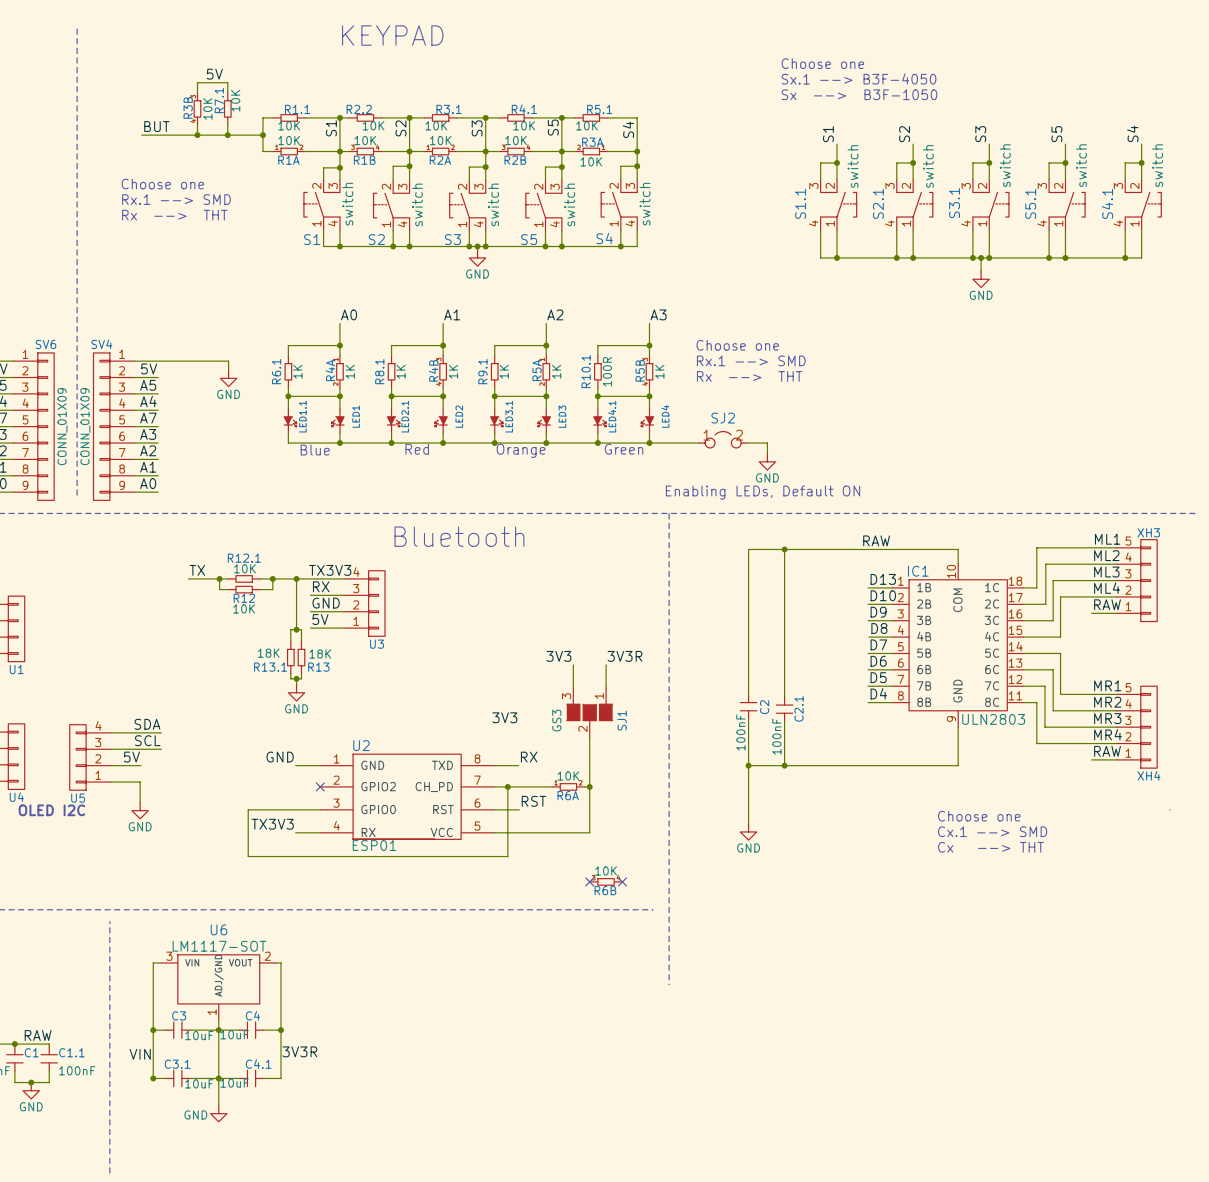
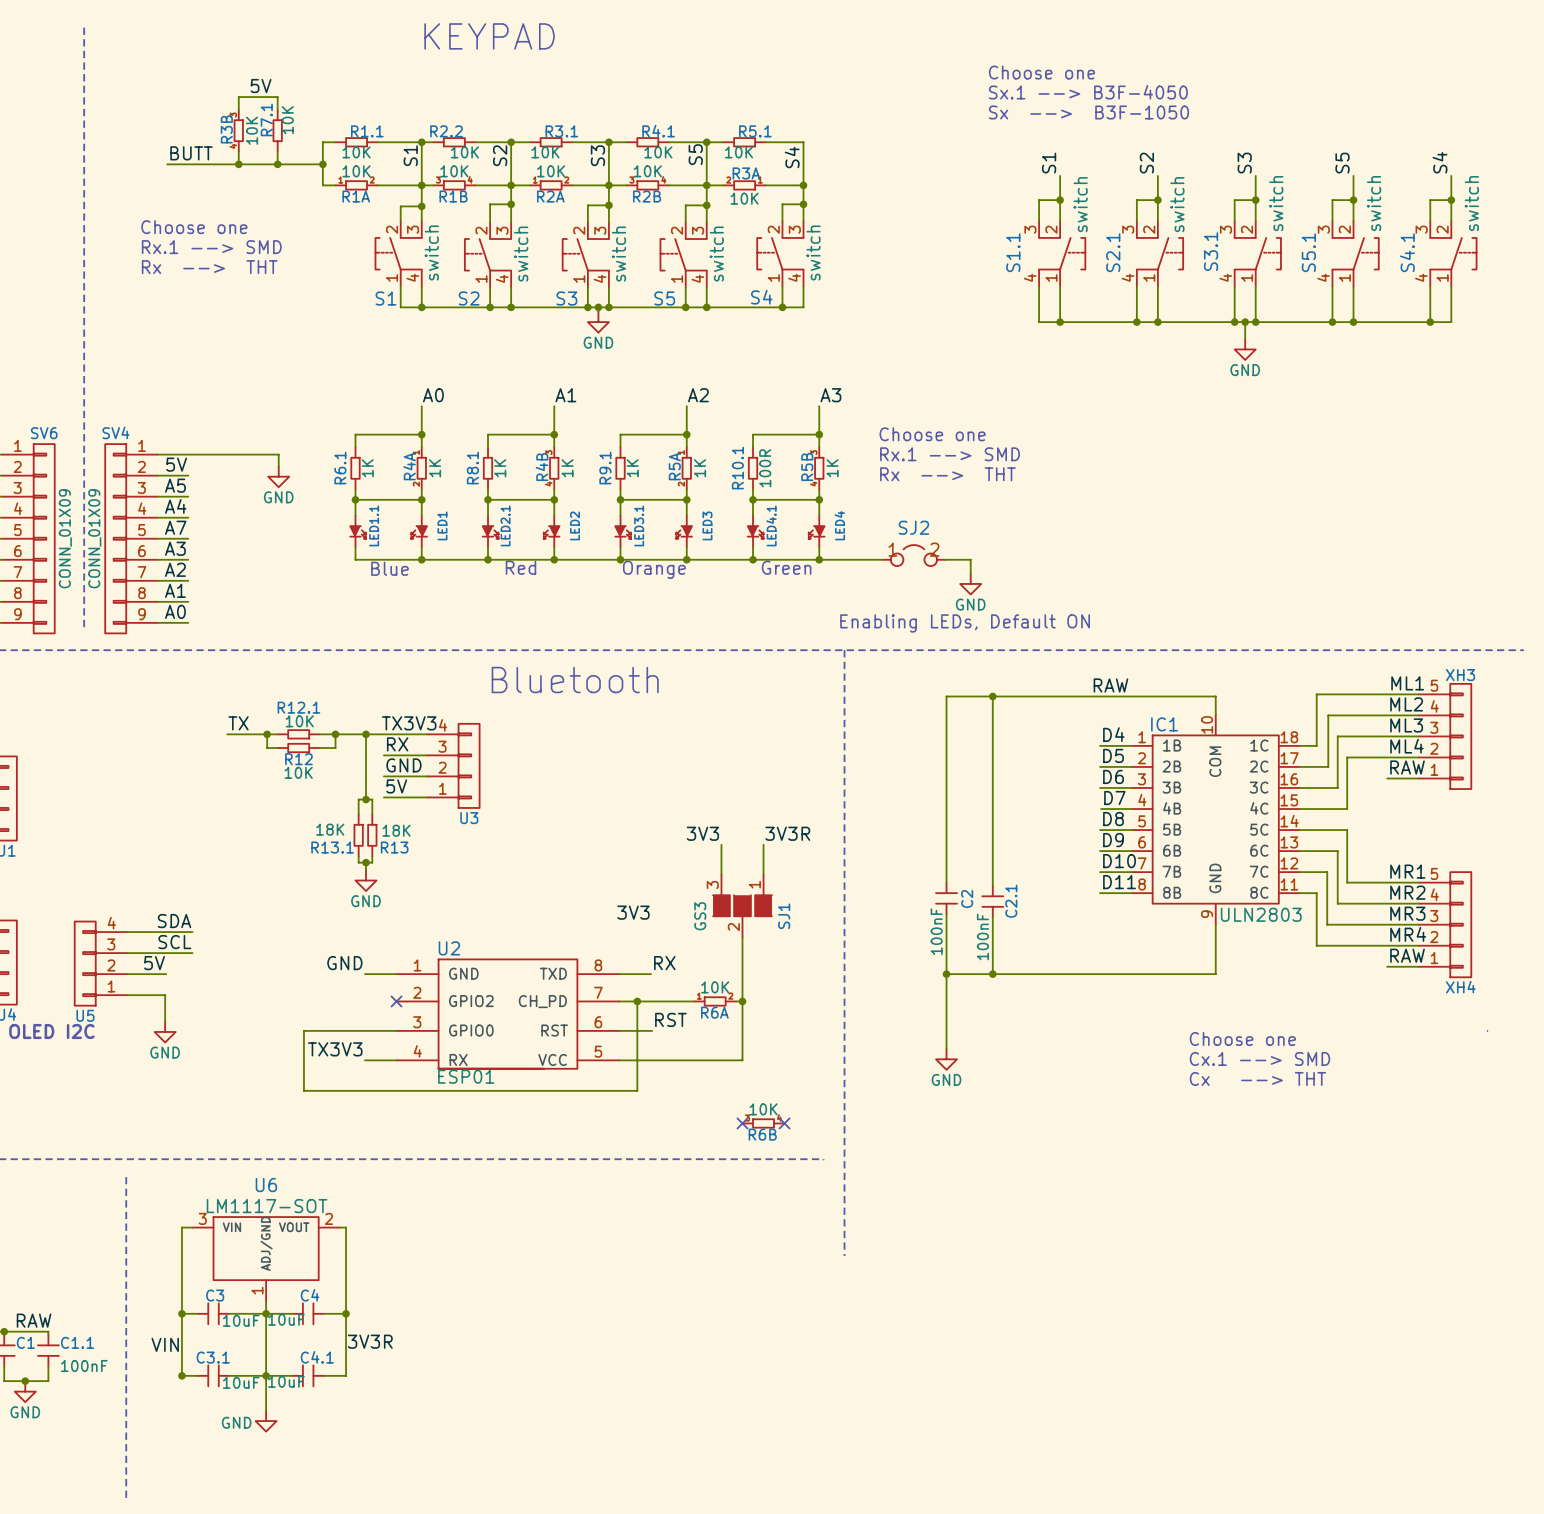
label: BUT (156, 126) -> BUTT (191, 153)
label: D13 (883, 579) -> D4 (1113, 734)
label: D10 (883, 595) -> D5 (1113, 755)
label: D9 (878, 612) -> D6 (1113, 776)
label: D8 (879, 628) -> D7 (1114, 798)
label: D7 (878, 644) -> D8 (1113, 819)
label: D6 (878, 661) -> D9 (1113, 840)
label: D5 (878, 677) -> D10 (1119, 861)
label: D4 (878, 693) -> D11 (1119, 882)

